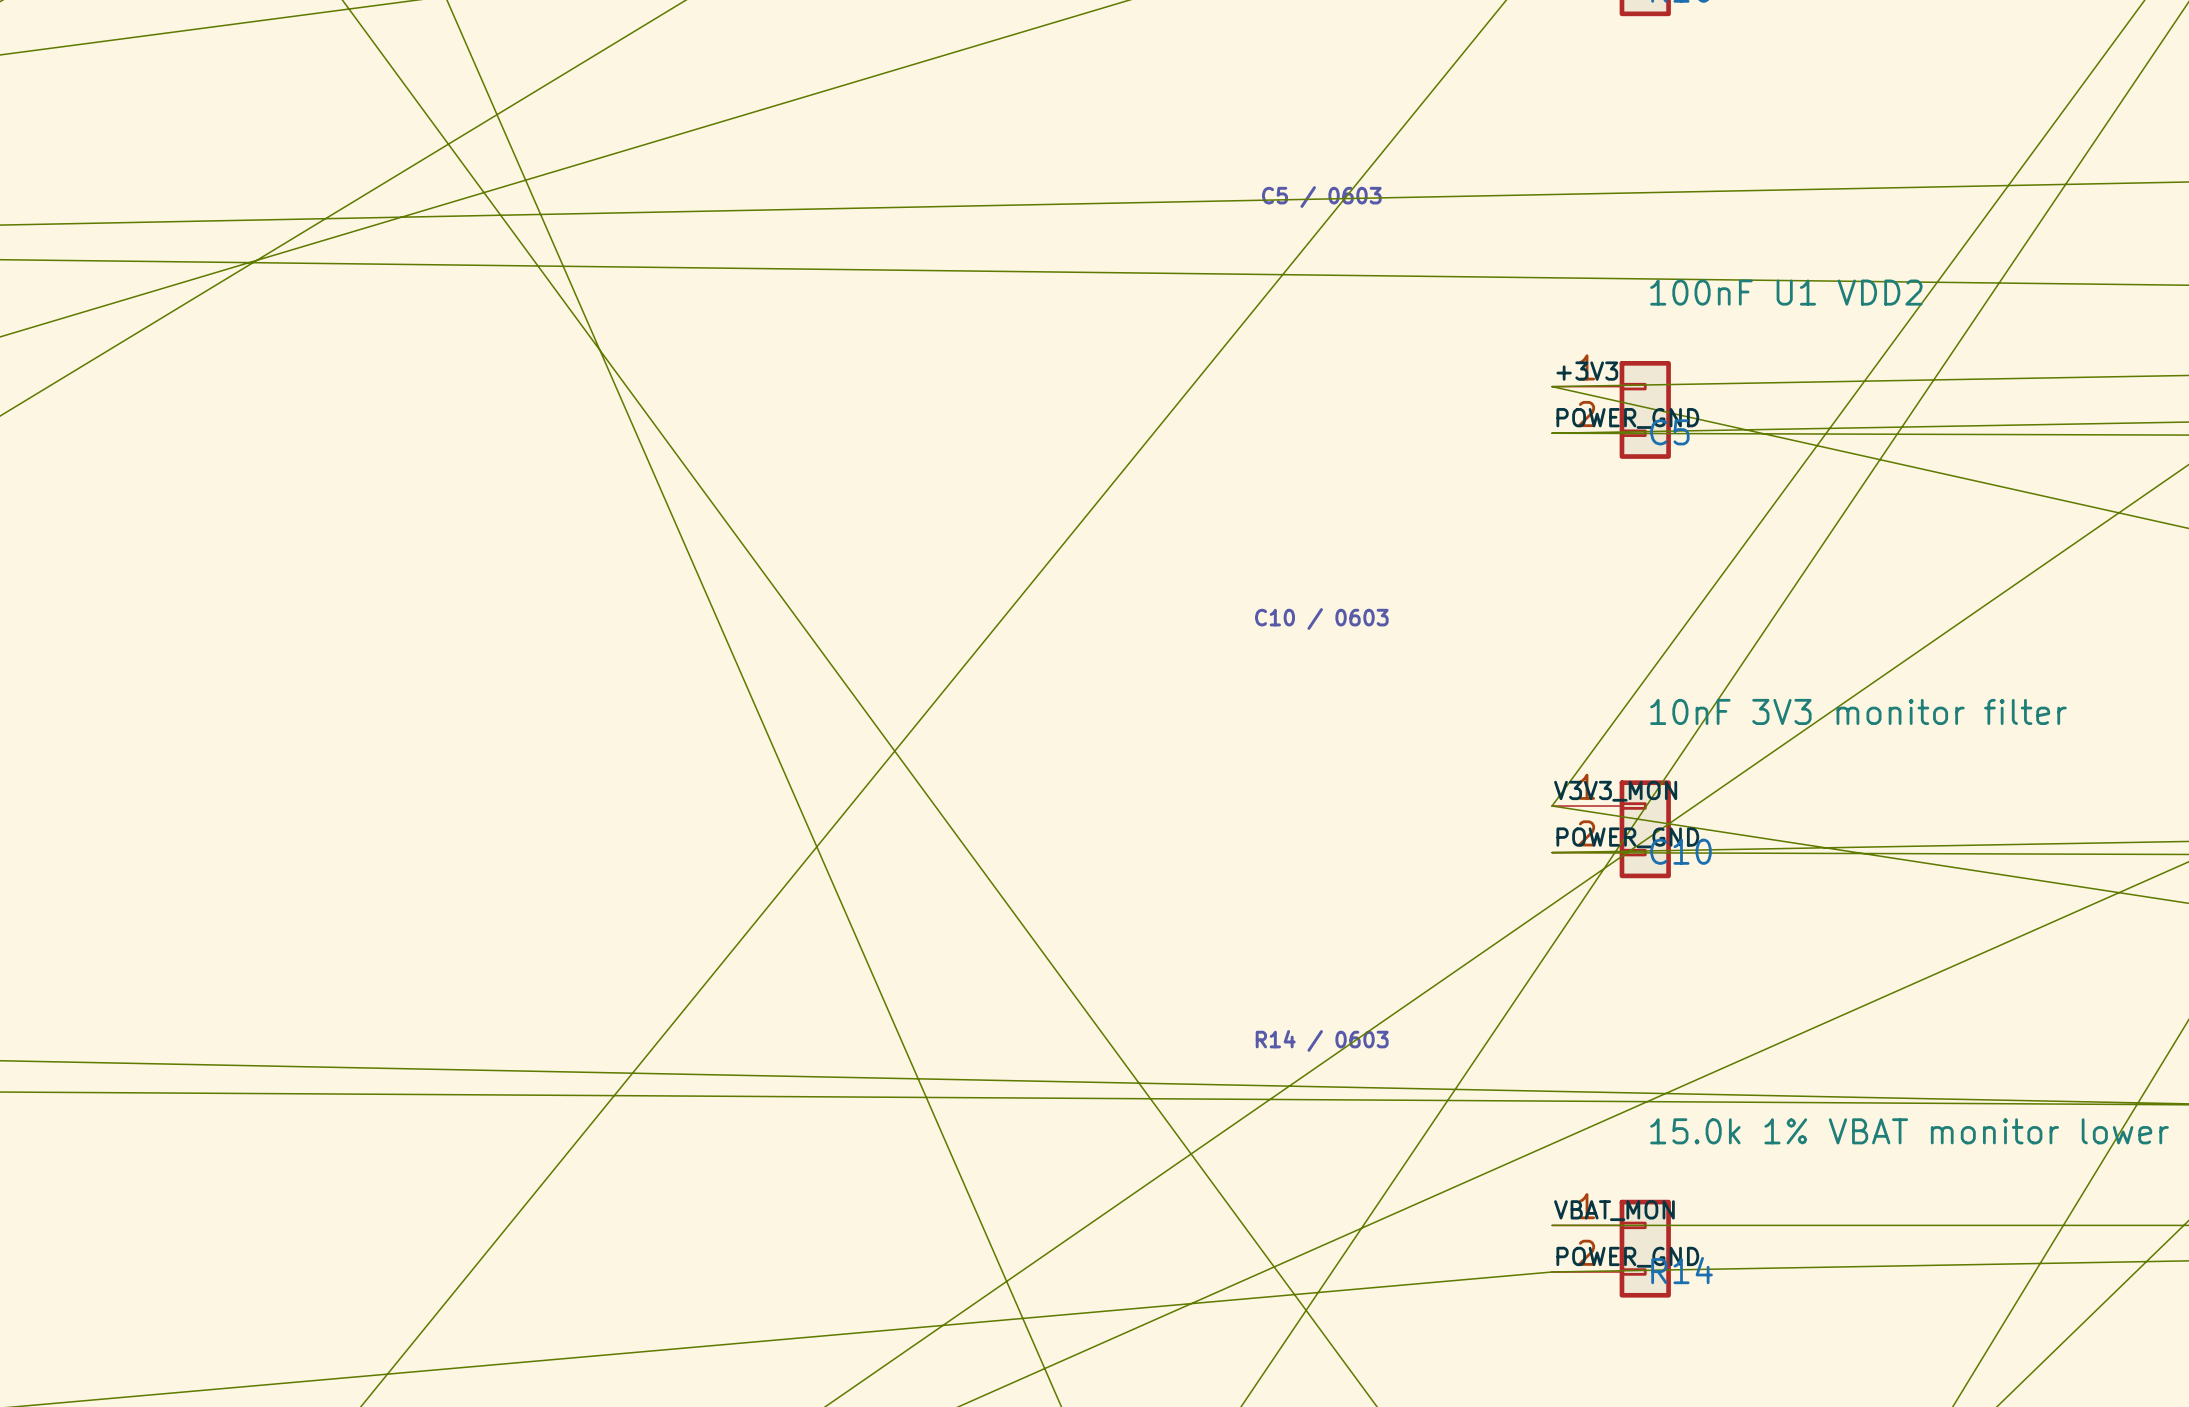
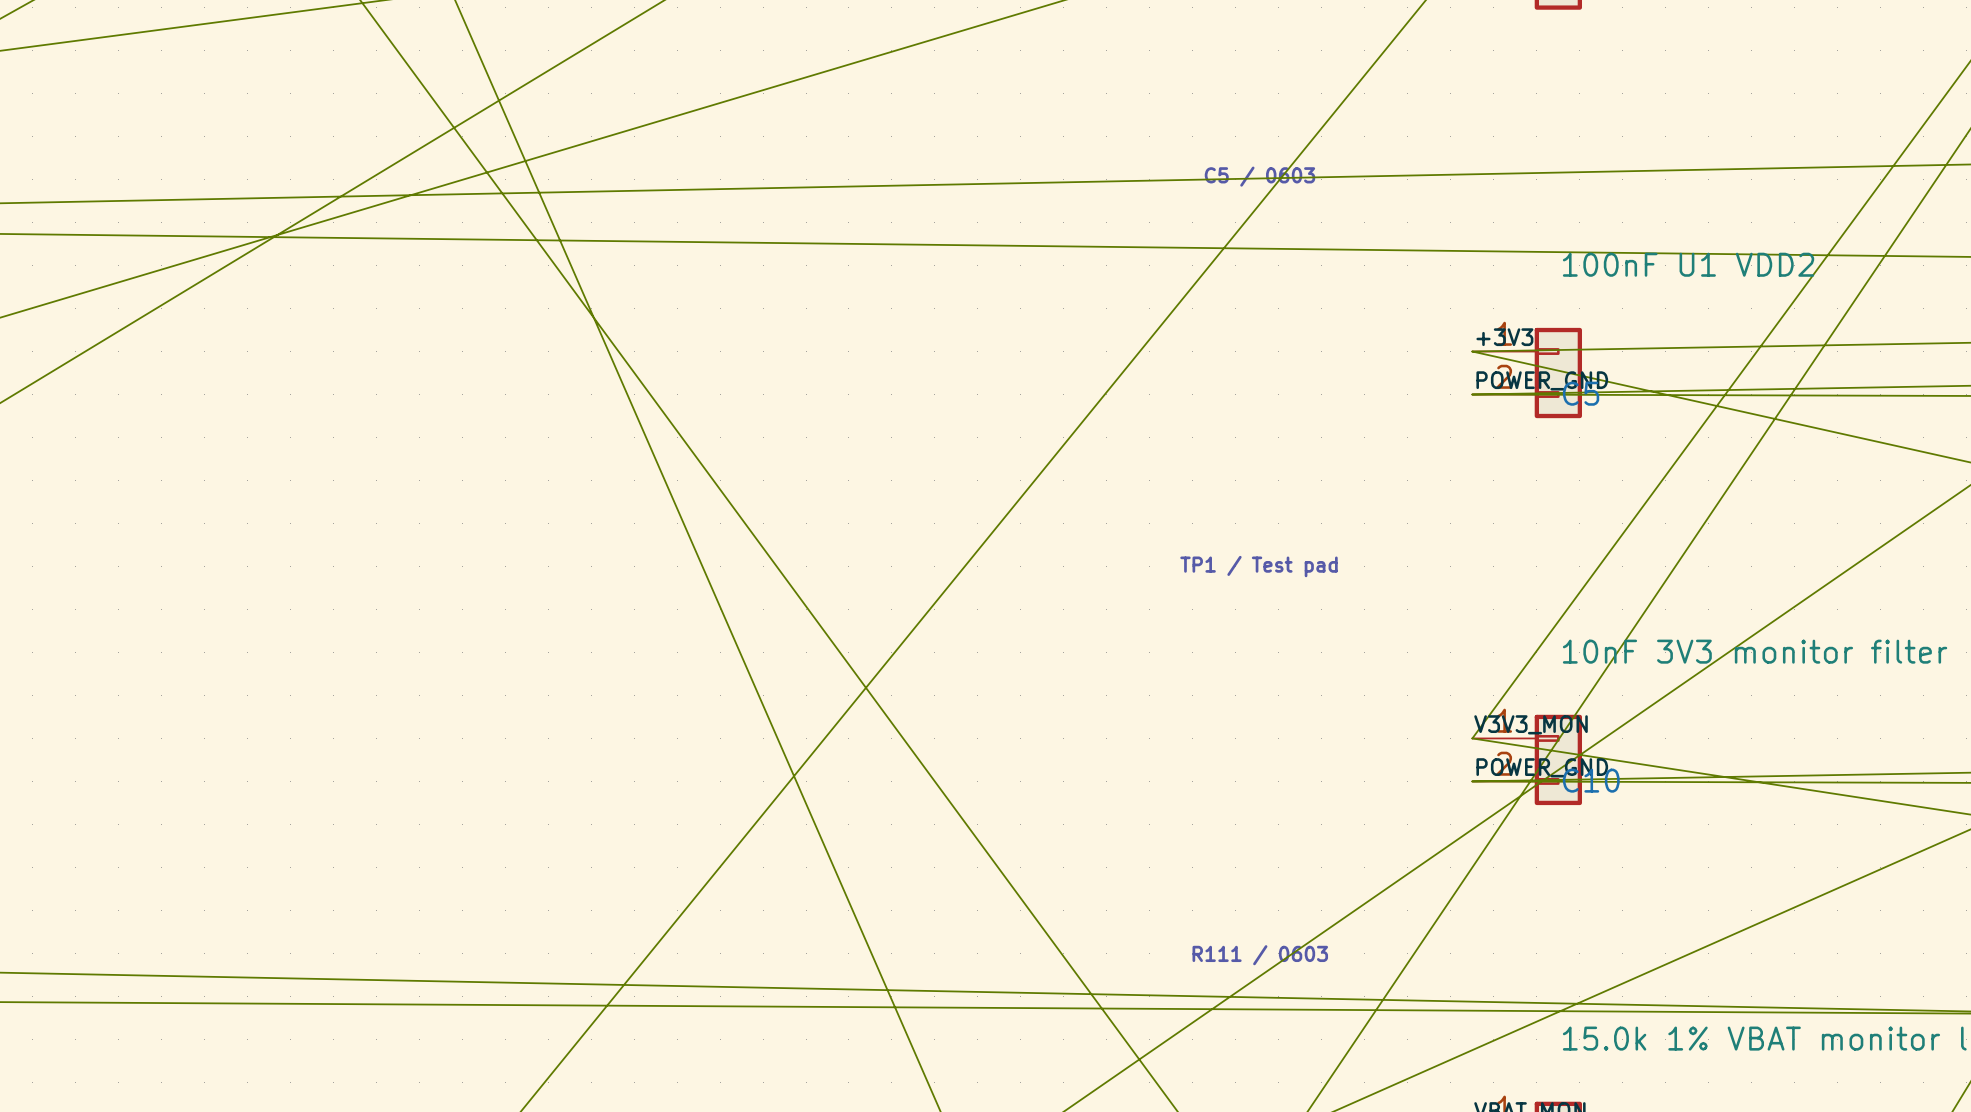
text: C10 / 0603 (1321, 619) -> TP1 / Test pad (1258, 566)
text: R14 / 0603 (1322, 1040) -> R111 / 0603 (1260, 955)

